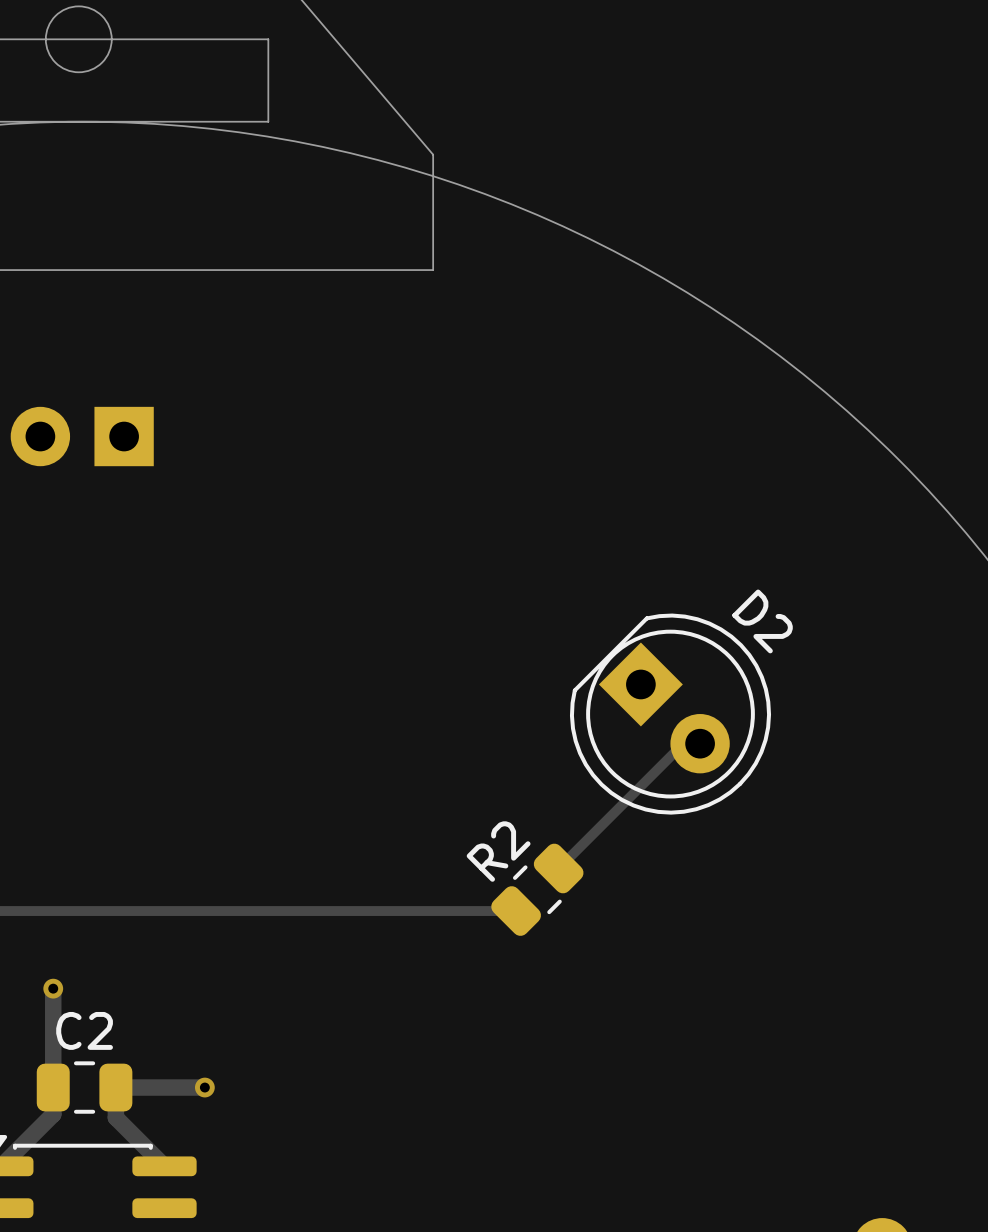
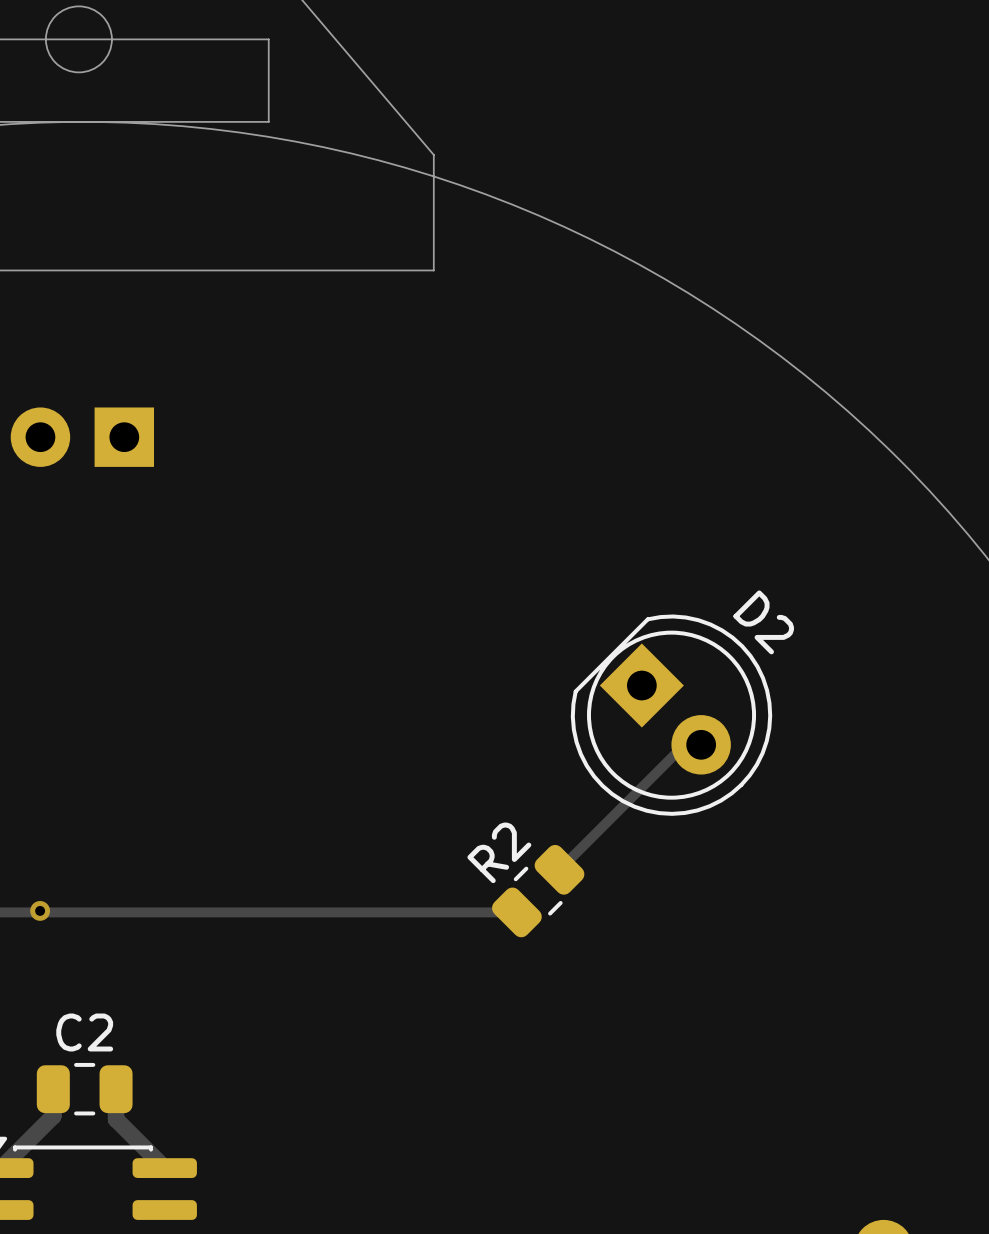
track: (53, 988) (53, 1087) (46, 1080) -> none
via position: (53, 988) -> (40, 910)
track: (115, 1087) (204, 1087) -> none
via: (204, 1087) -> none

